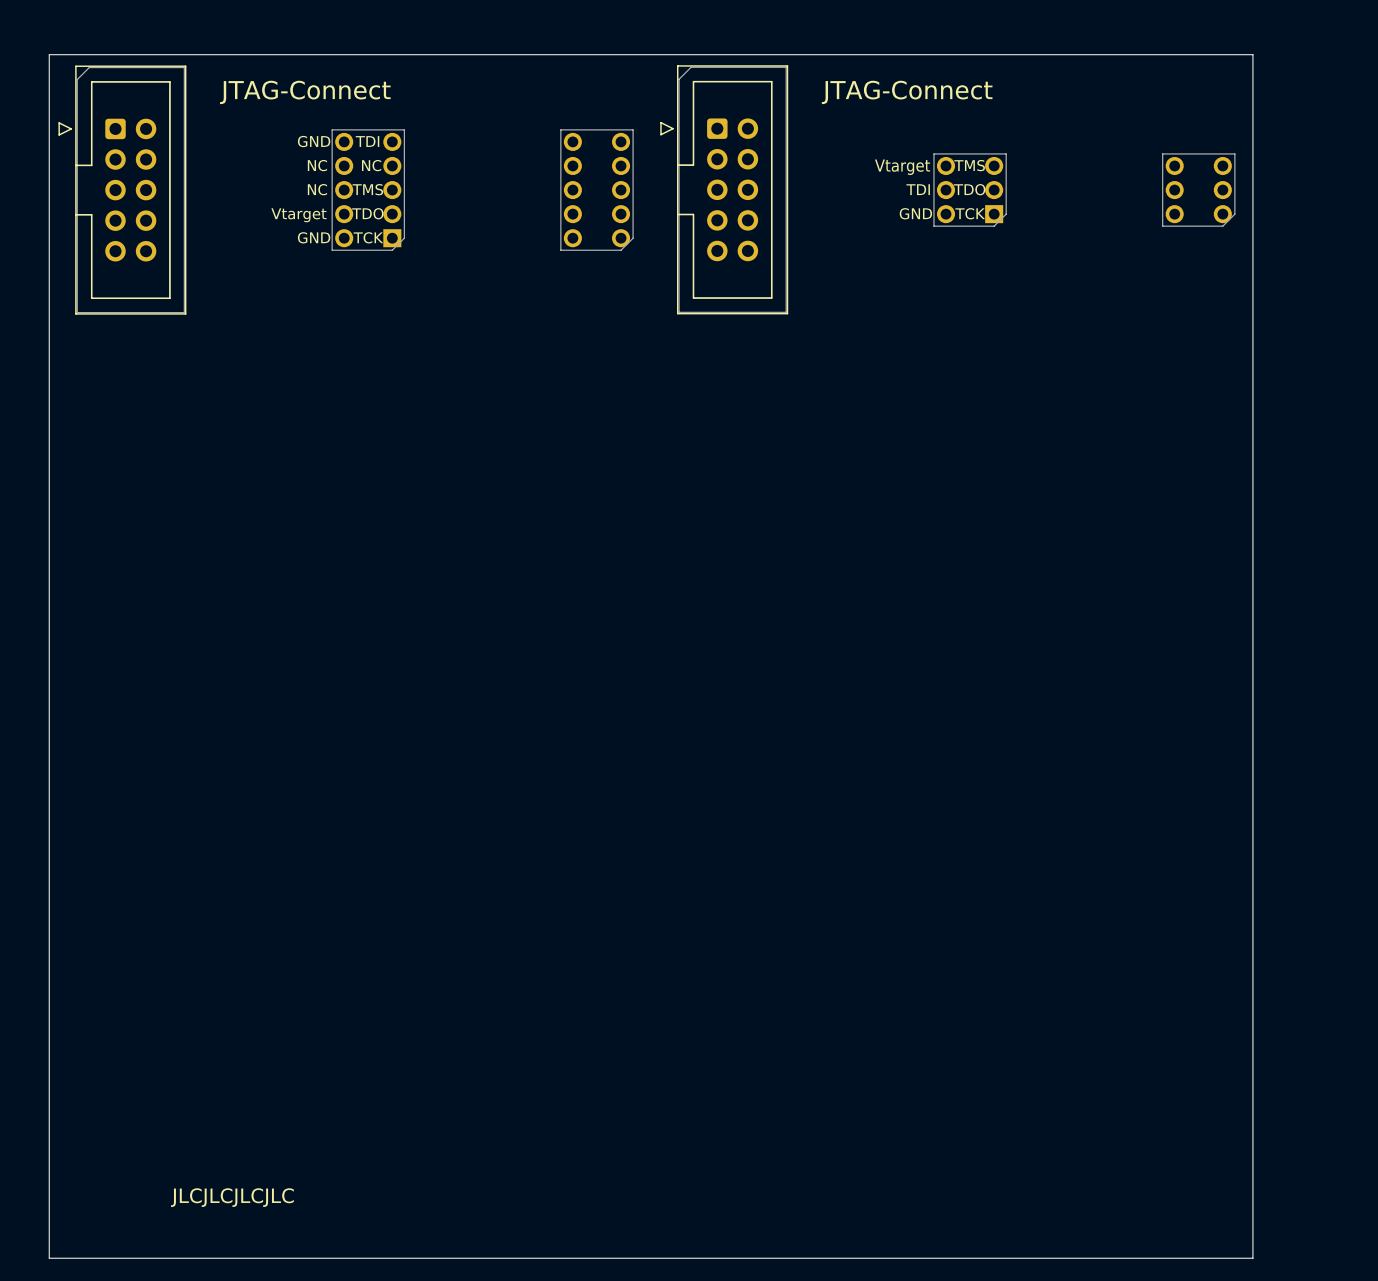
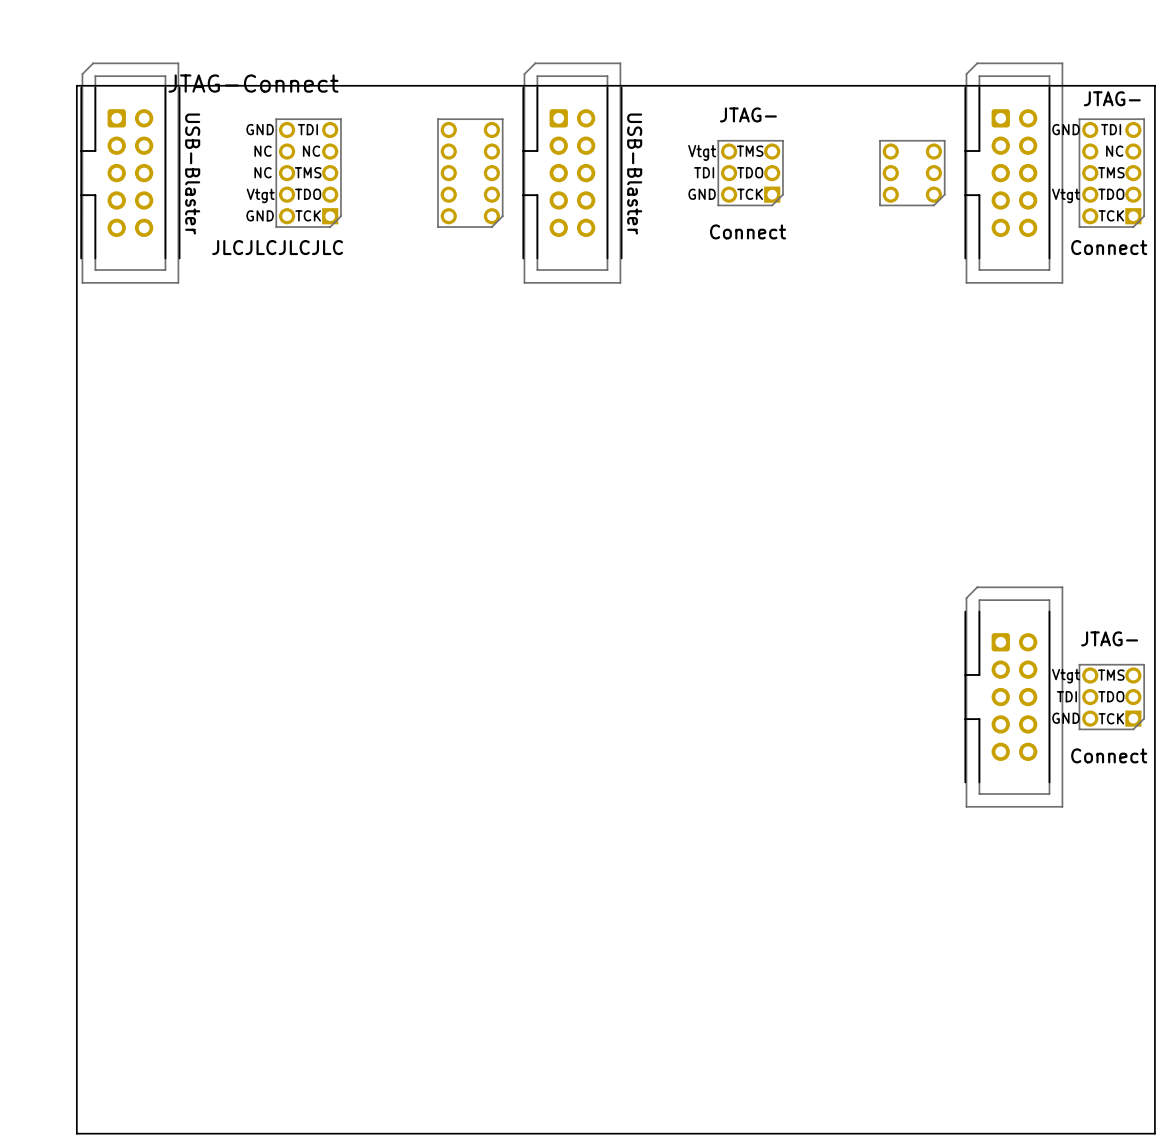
board edge: (49, 54) (49, 1258) (1252, 1258) (1252, 54) (49, 54) -> (76, 85) (76, 1133) (1154, 1133) (1154, 85) (76, 85)
text: JTAG-Connect (907, 92) -> none
text: none -> JTAG- (1112, 98)
text: none -> JTAG- (748, 114)
text: none -> GND (1065, 129)
text: none -> TDI (1111, 129)
text position: TMS (969, 165) -> TMS (750, 151)
text: none -> NC (1114, 151)
text: none -> Vtgt (702, 152)
text: Vtarget (902, 167) -> none
part: (724, 189) -> none
text position: TDI (918, 189) -> TDI (704, 172)
text position: TDO (969, 189) -> TDO (750, 172)
text: none -> TMS (1111, 172)
part: (122, 190) -> none
part: none -> (130, 173)
text: none -> USB-Blaster (192, 174)
part position: (596, 190) -> (470, 173)
part: none -> (572, 173)
text: none -> USB-Blaster (634, 174)
part position: (970, 190) -> (750, 173)
part: none -> (1013, 173)
part position: (1198, 190) -> (912, 173)
part: none -> (1111, 173)
text position: GND (915, 213) -> GND (702, 194)
text position: TCK (970, 213) -> TCK (750, 194)
text: none -> TDO (1111, 194)
text: Vtarget (298, 215) -> Vtgt (260, 195)
text: none -> Vtgt (1065, 195)
text: none -> TCK (1111, 215)
text: none -> Connect (748, 231)
text: none -> Connect (1109, 247)
text: none -> JLCJLCJLCJLC (277, 247)
text: none -> JTAG- (1109, 638)
text: none -> TMS (1111, 675)
text: none -> Vtgt (1065, 676)
text: none -> TDI (1066, 696)
text: none -> TDO (1111, 696)
part: none -> (1013, 697)
part: none -> (1111, 697)
text: none -> GND (1065, 718)
text: none -> TCK (1111, 718)
text: none -> Connect (1109, 755)
text: JLCJLCJLCJLC (232, 1197) -> none

